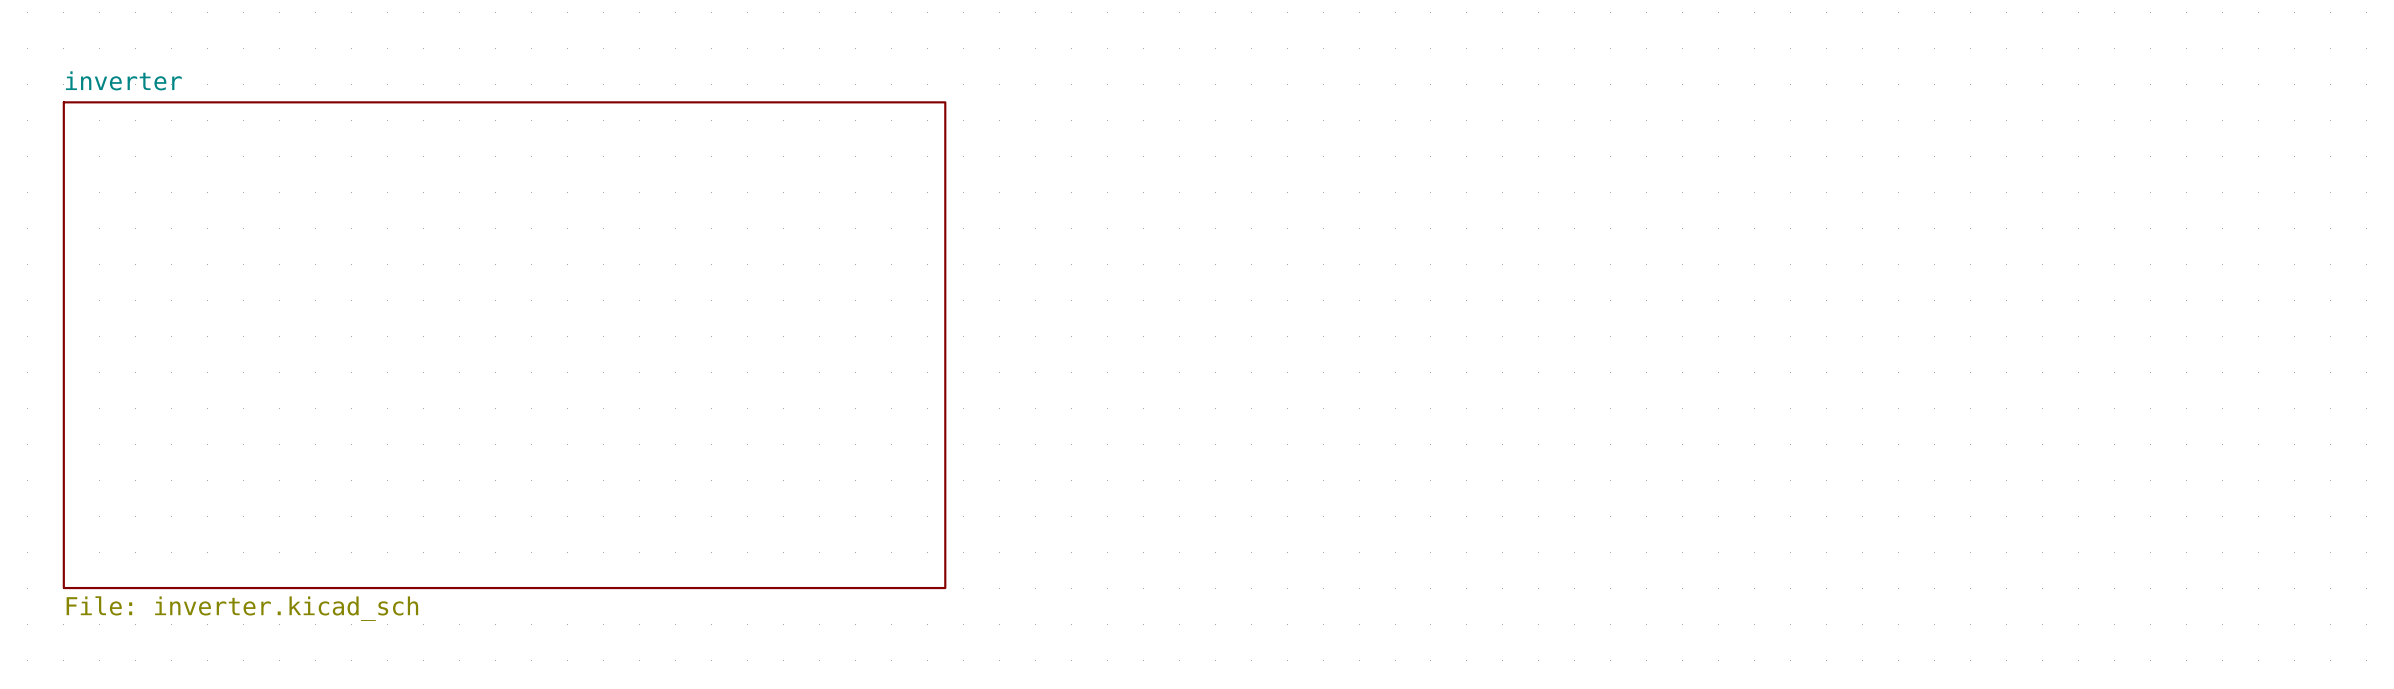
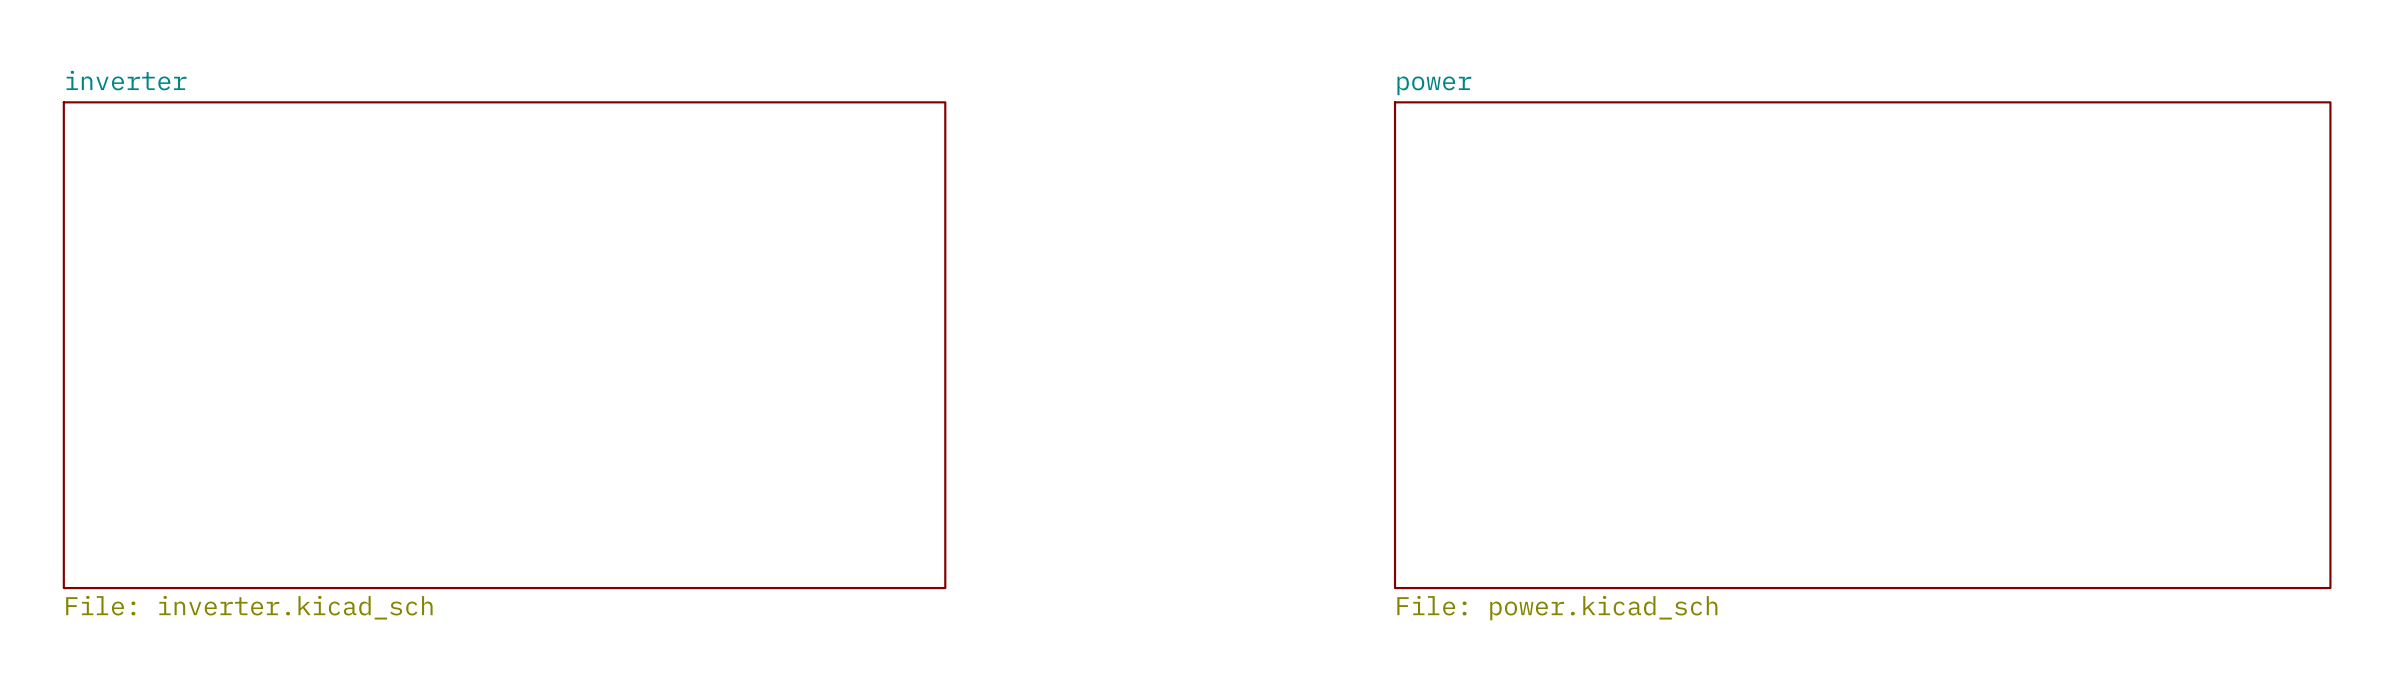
sheet power: none -> File: power.kicad_sch (1862, 345)

